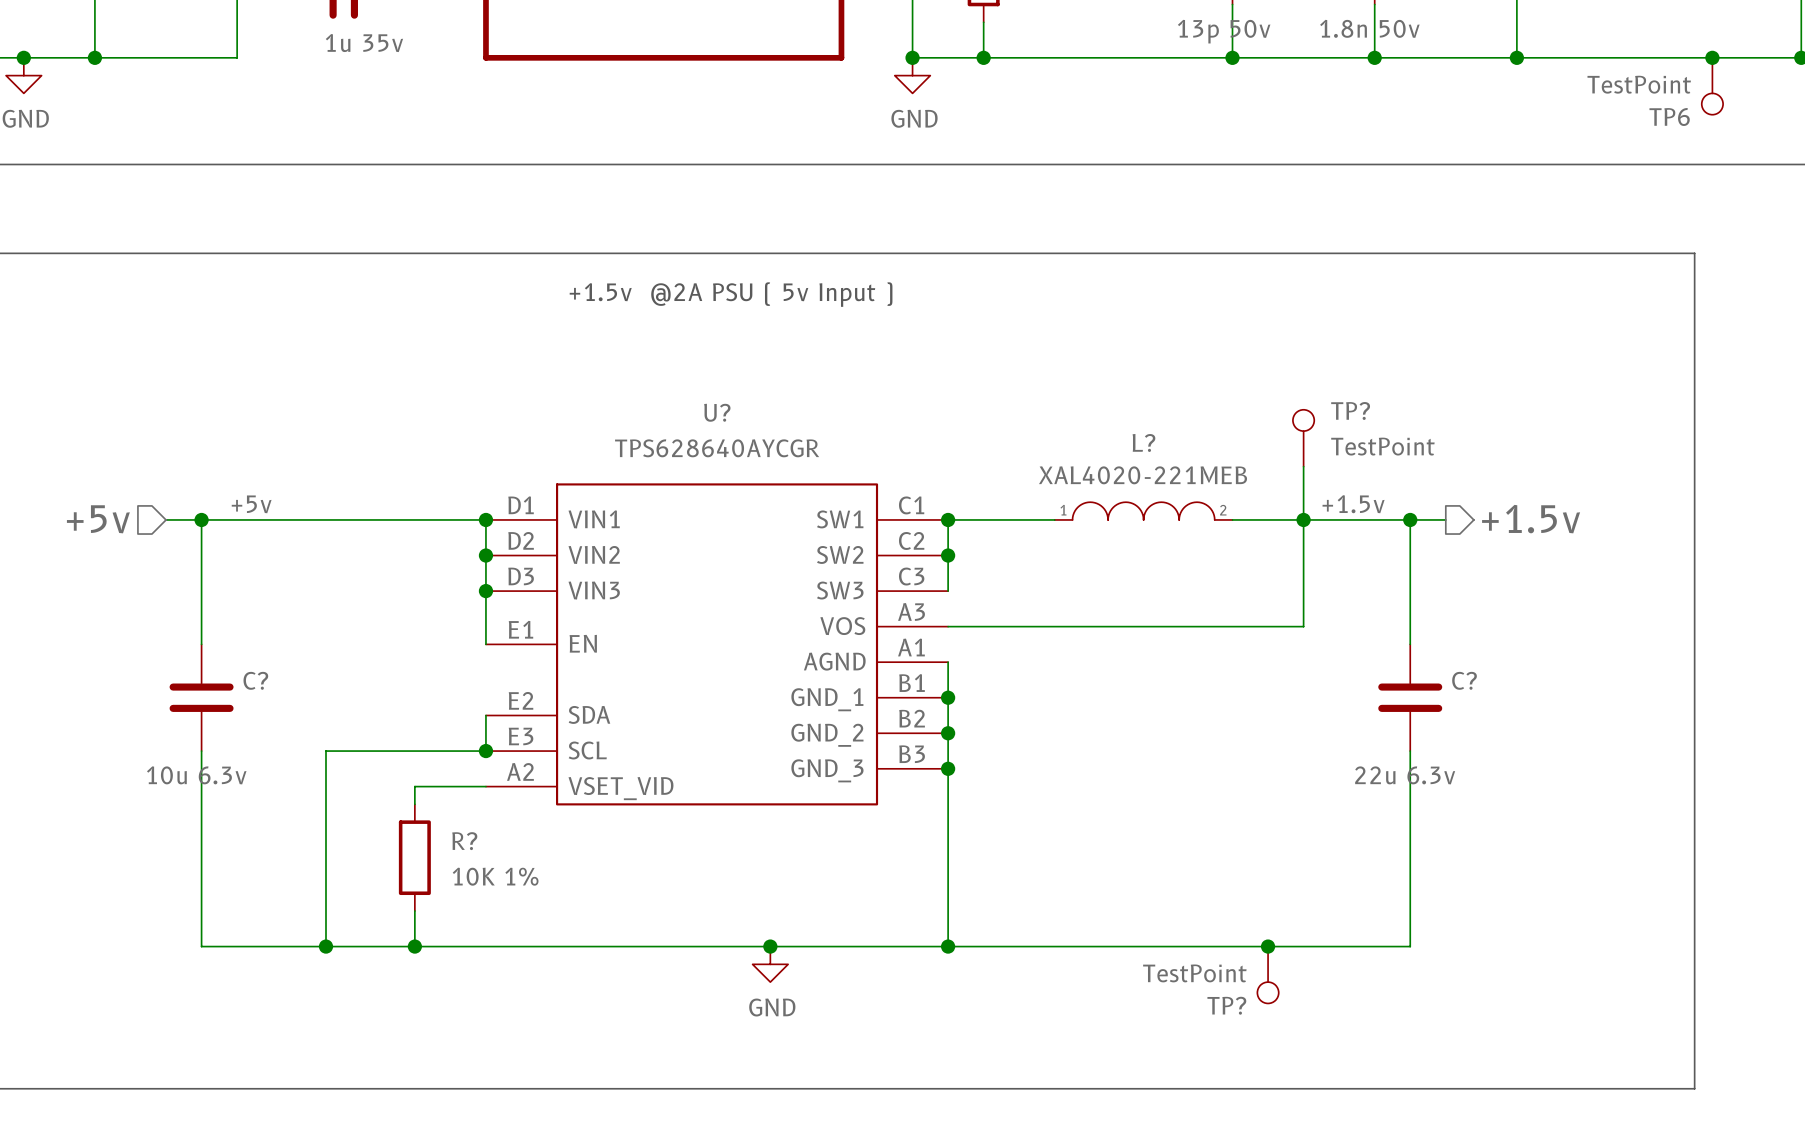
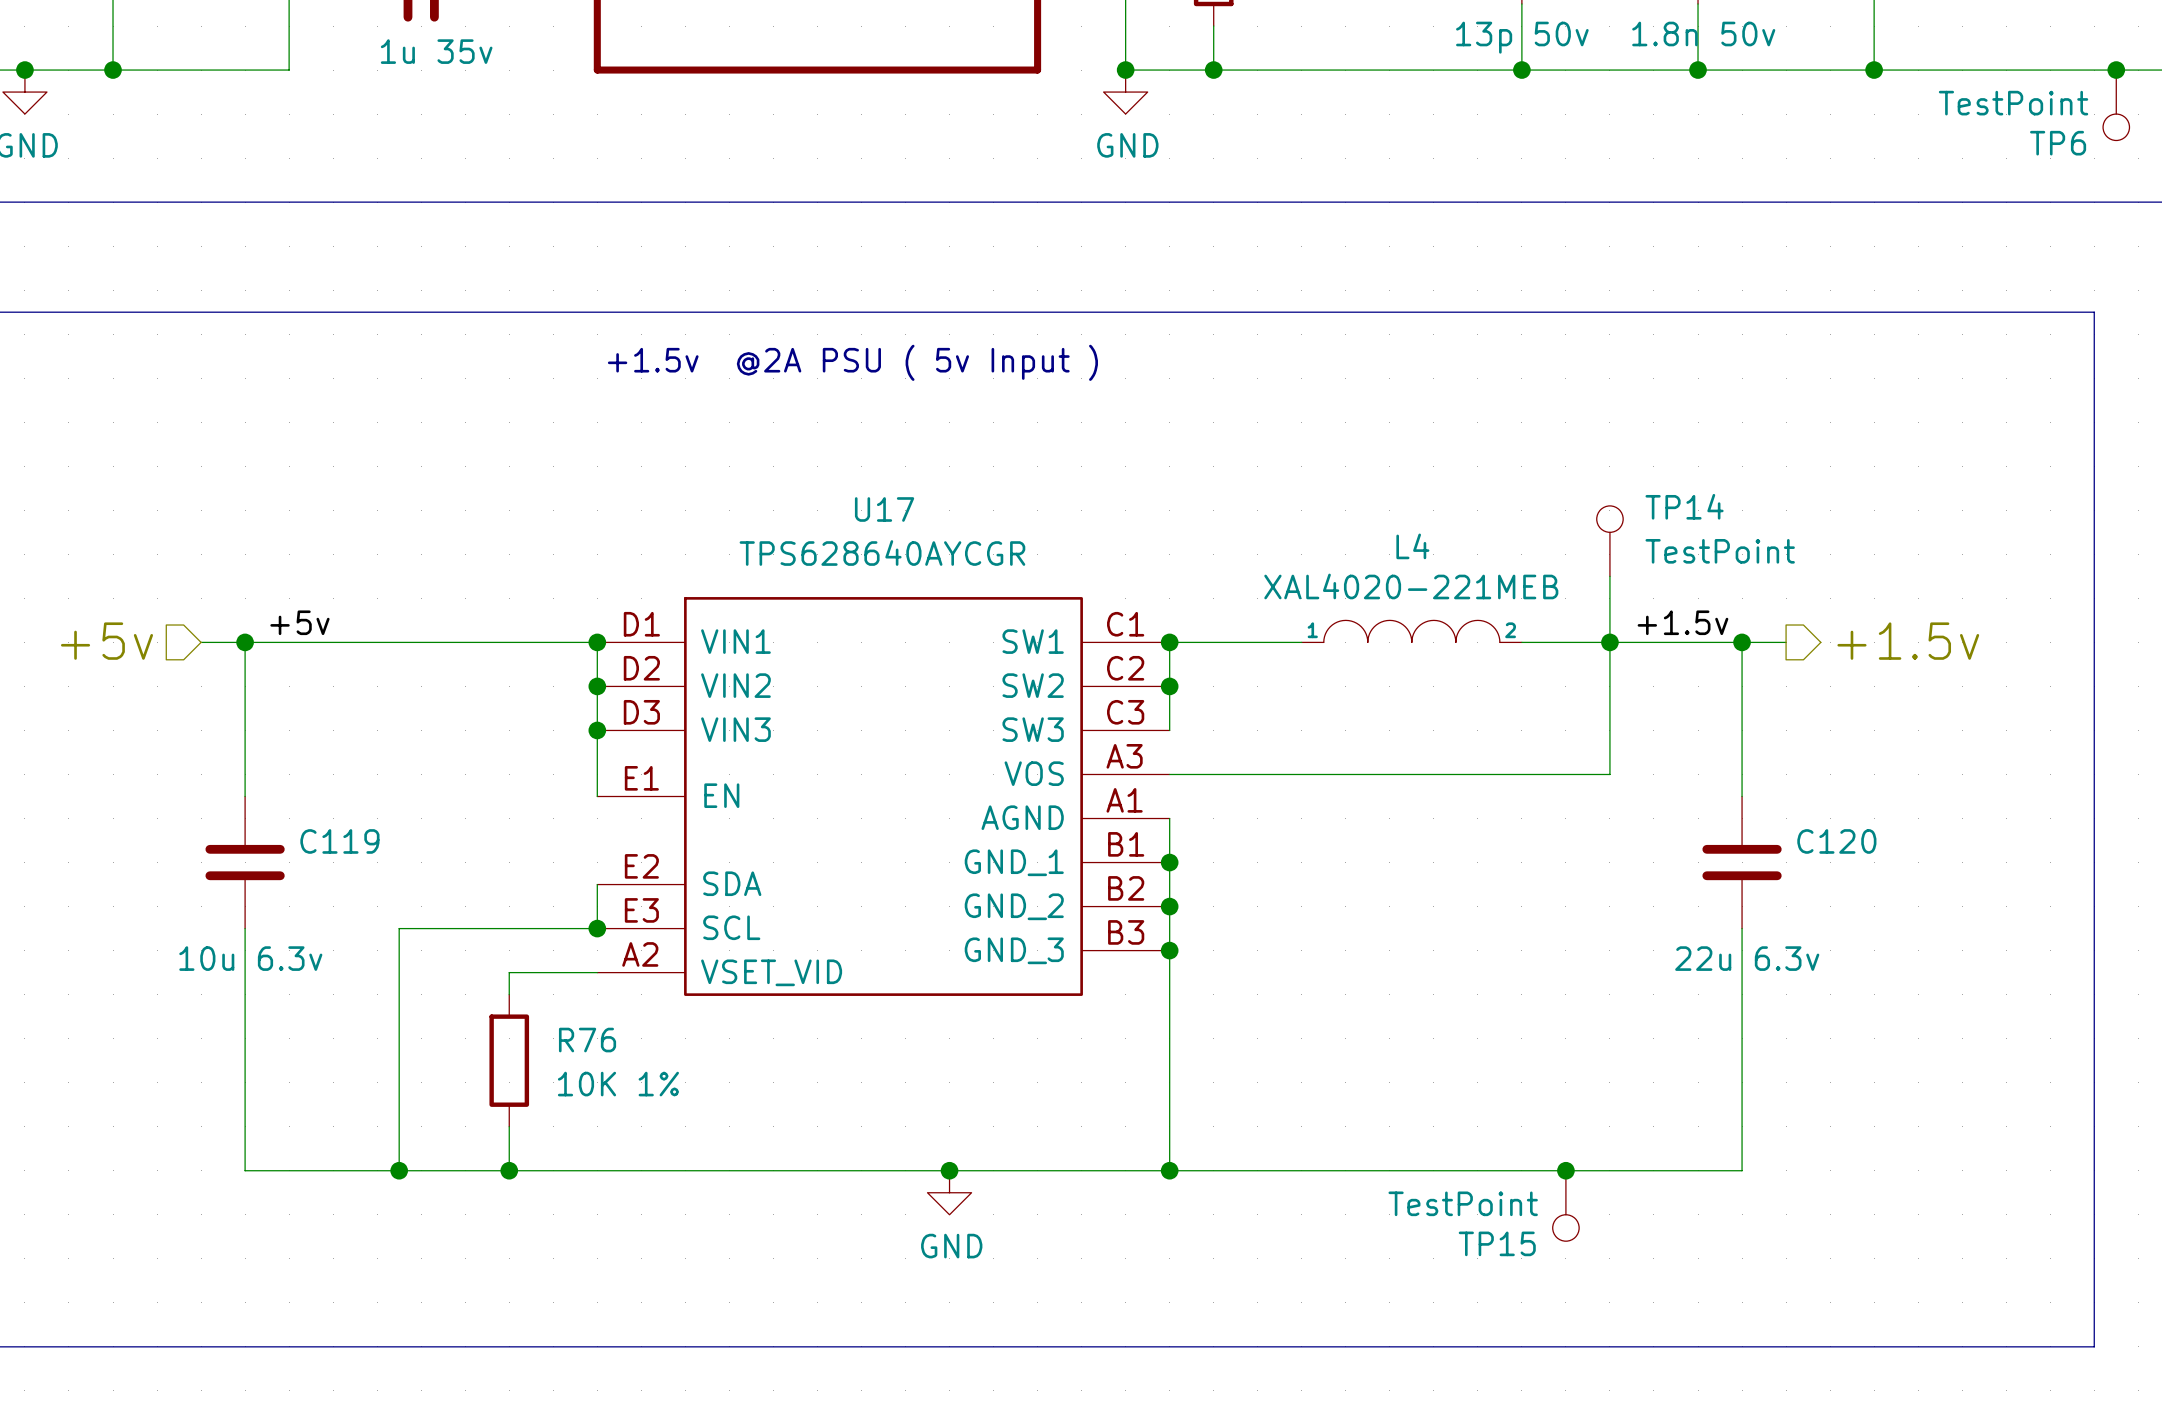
TP? name: TP? (1350, 410) -> TP14 (1684, 506)
U? name: U? (717, 412) -> U17 (884, 509)
L? name: L? (1143, 442) -> L4 (1412, 546)
C? name: C? (255, 680) -> C119 (339, 841)
C? name: C? (1464, 680) -> C120 (1836, 841)
R? name: R? (464, 841) -> R76 (587, 1040)
TP? name: TP? (1226, 1005) -> TP15 (1497, 1243)

